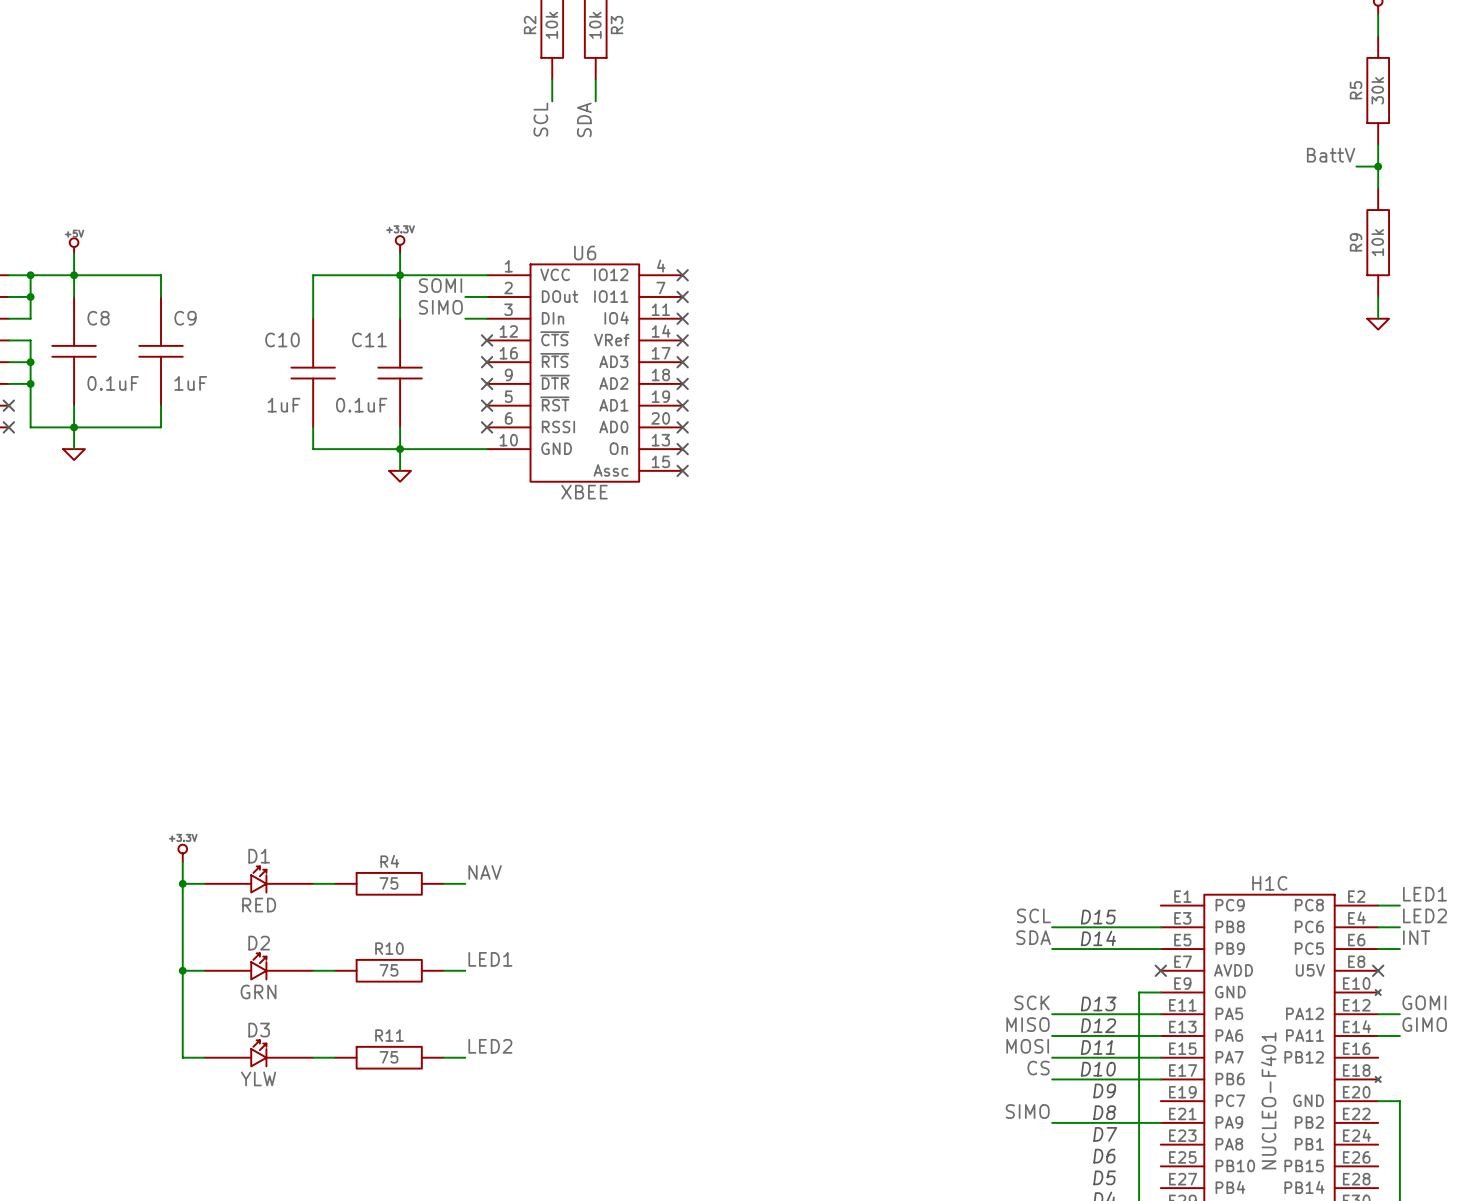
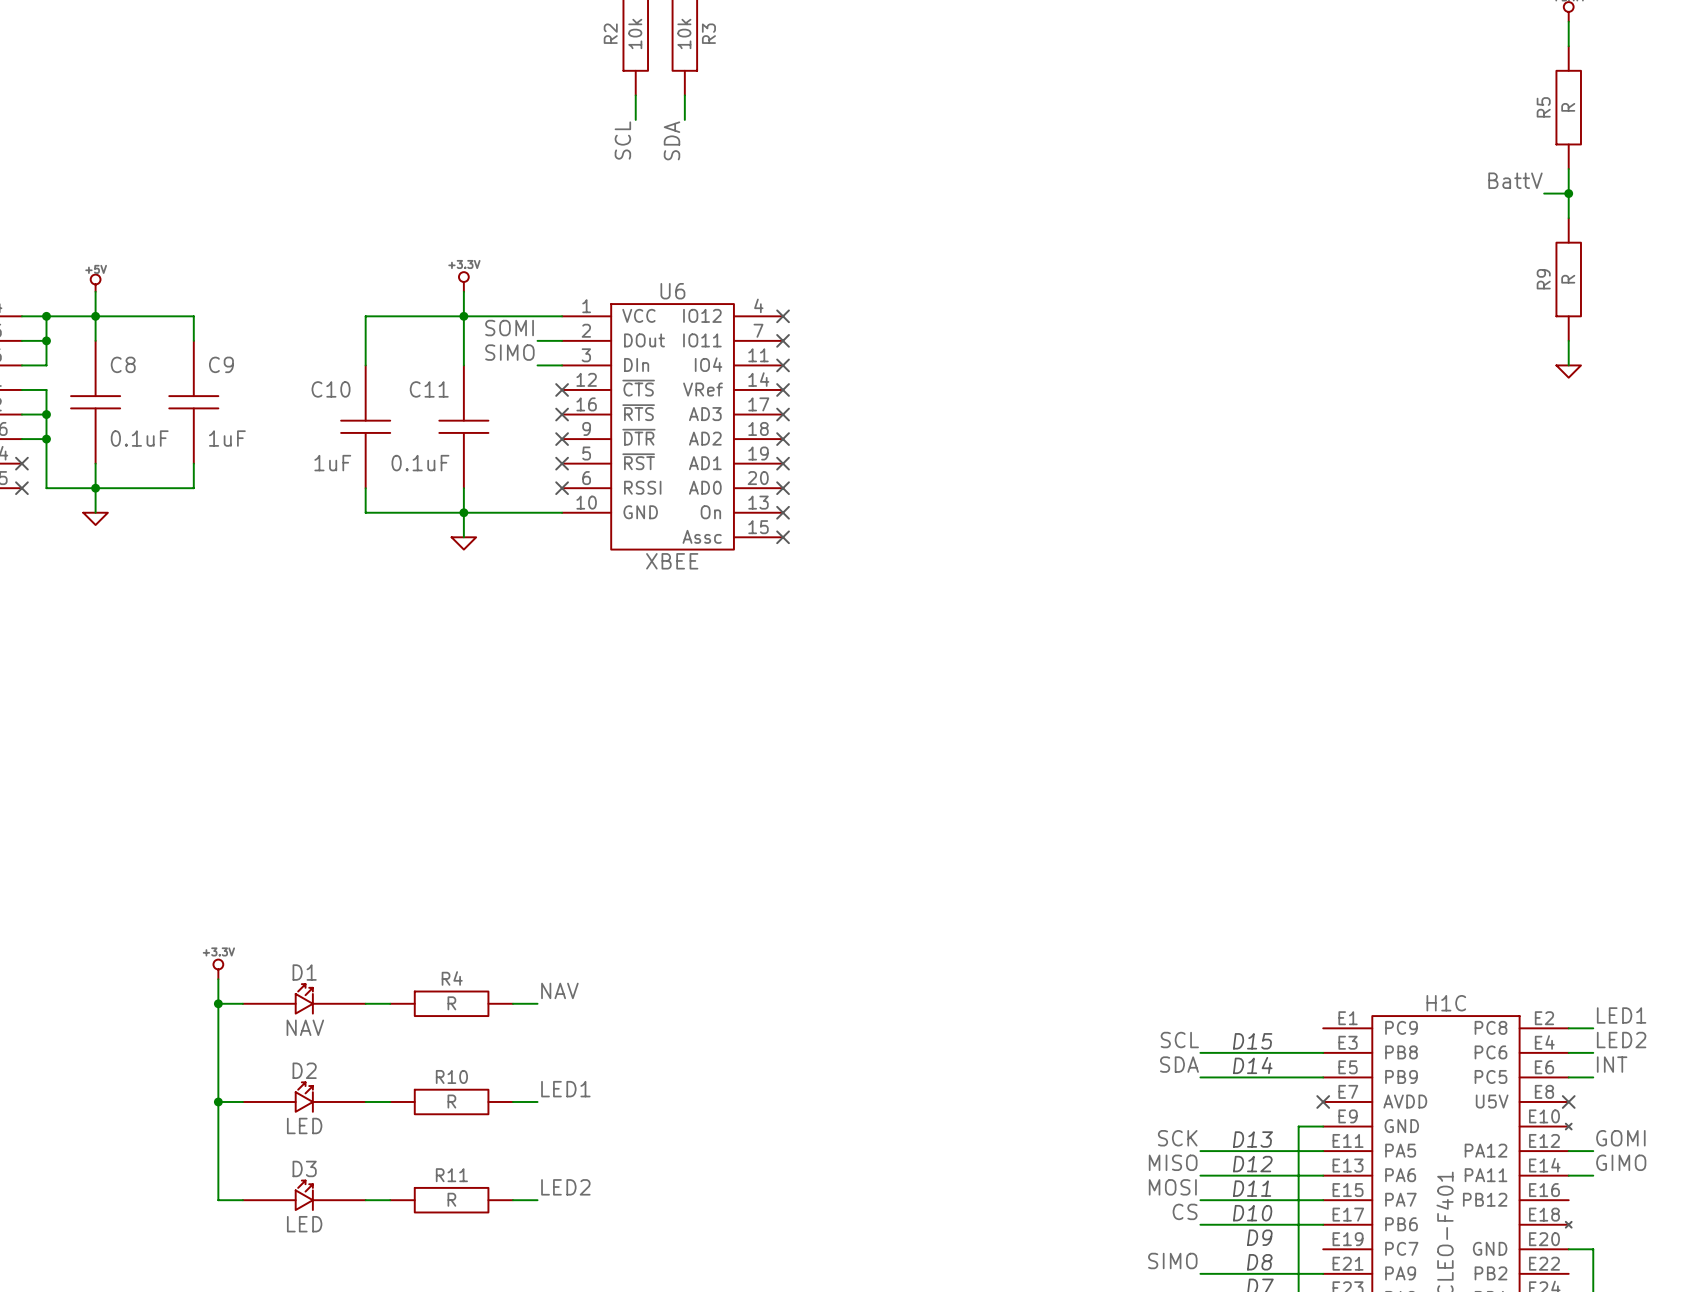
R5 value: 30k (1377, 90) -> R (1568, 107)
R9 value: 10k (1377, 242) -> R (1568, 279)
R4 value: 75 (388, 883) -> R (451, 1003)
D1 value: RED (259, 905) -> NAV (305, 1027)
R10 value: 75 (388, 970) -> R (451, 1101)
D2 value: GRN (258, 992) -> LED (304, 1125)
R11 value: 75 (388, 1057) -> R (451, 1199)
D3 value: YLW (258, 1078) -> LED (304, 1224)

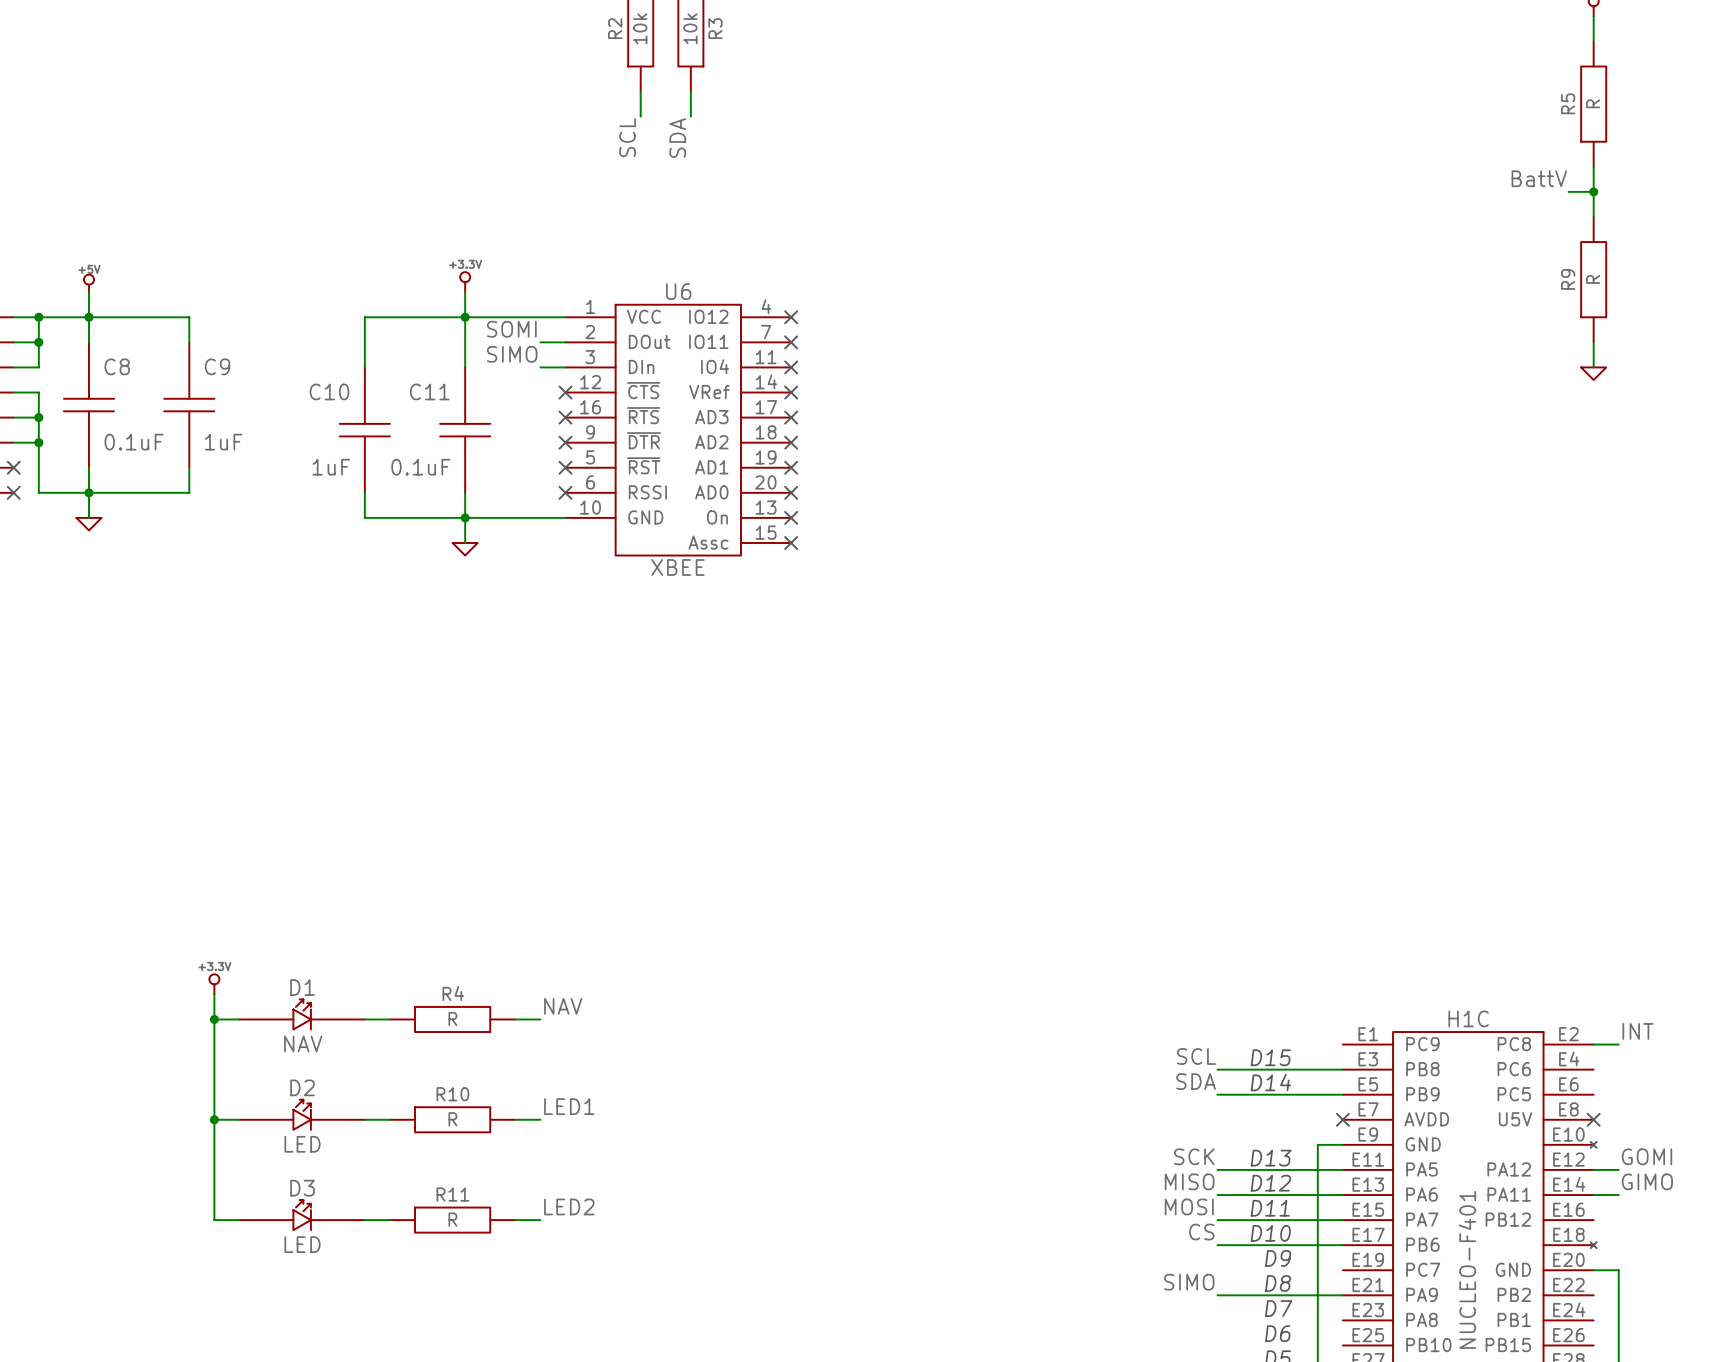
label: LED1 (1621, 1015) -> INT (1638, 1031)
label: LED2 (1621, 1040) -> none
wire: (1568, 1052) (1593, 1052) -> none
label: INT (1612, 1064) -> none
wire: (1568, 1077) (1593, 1077) -> none

